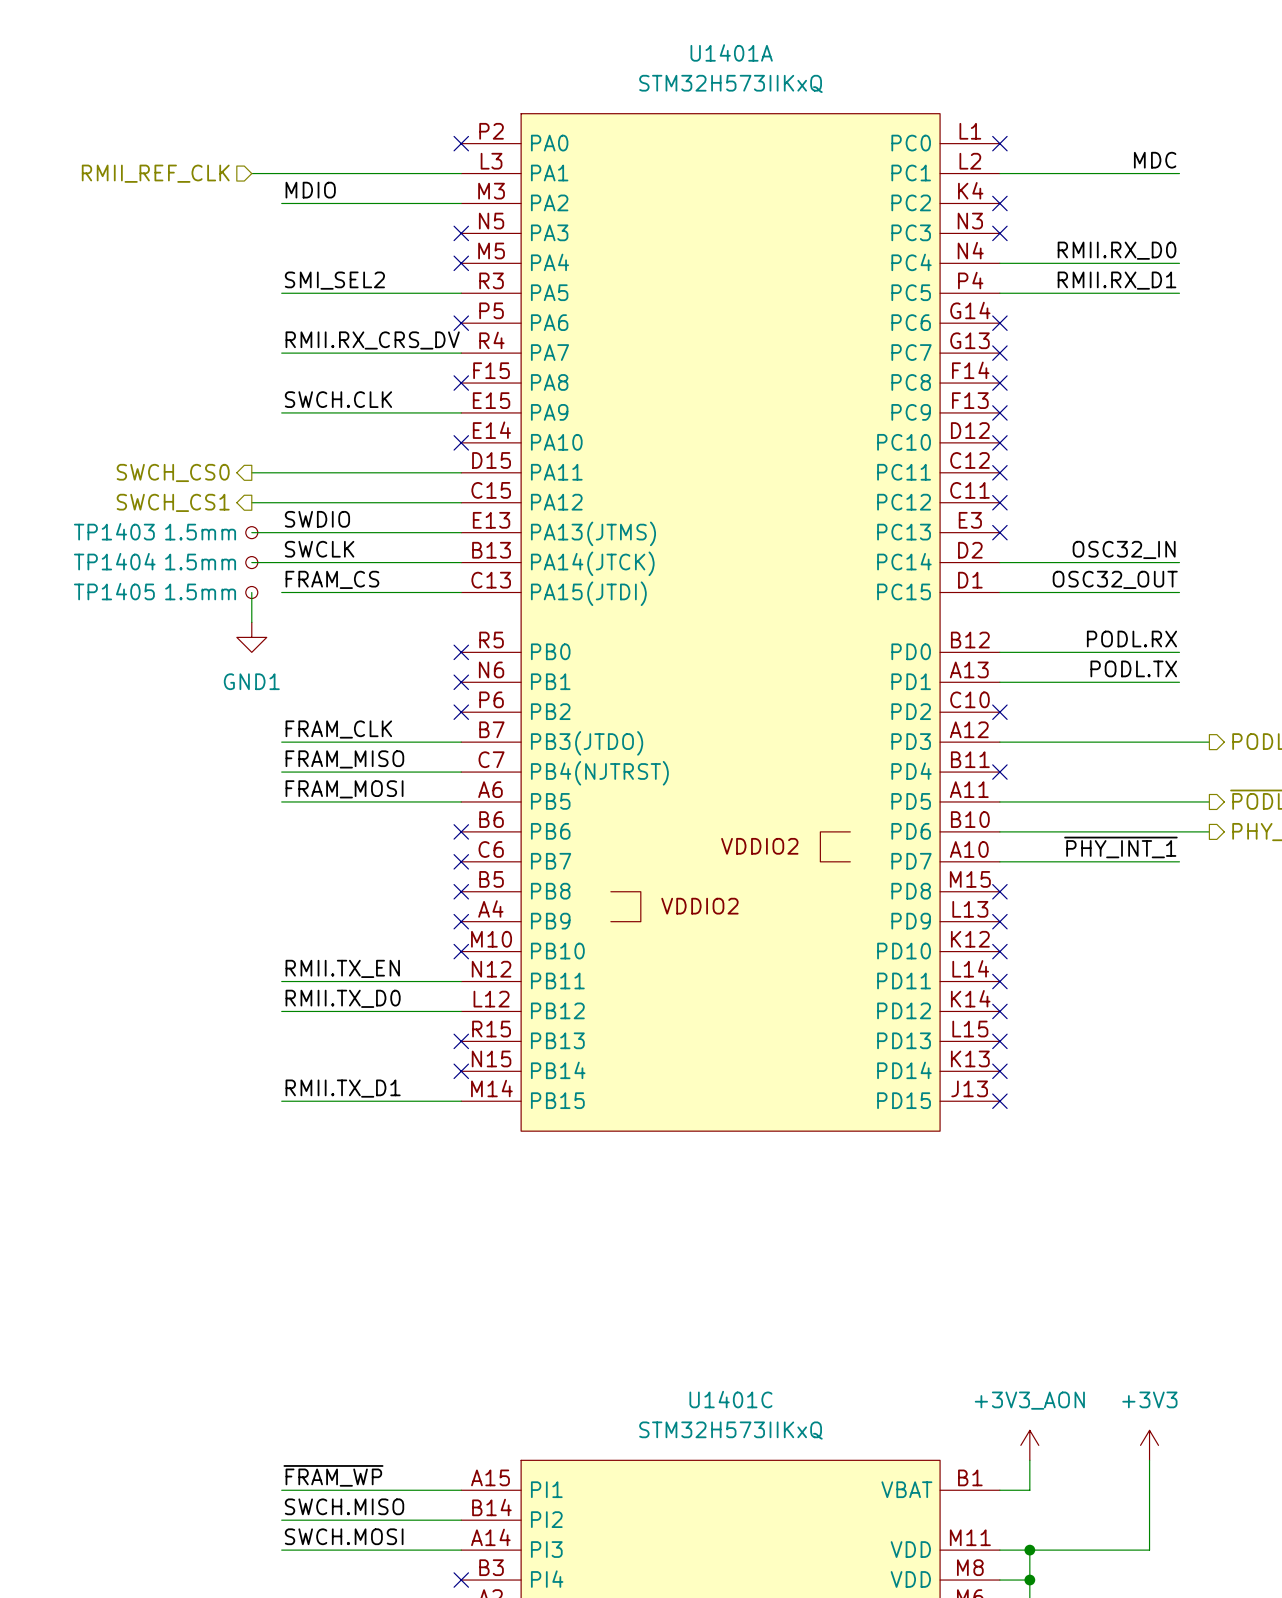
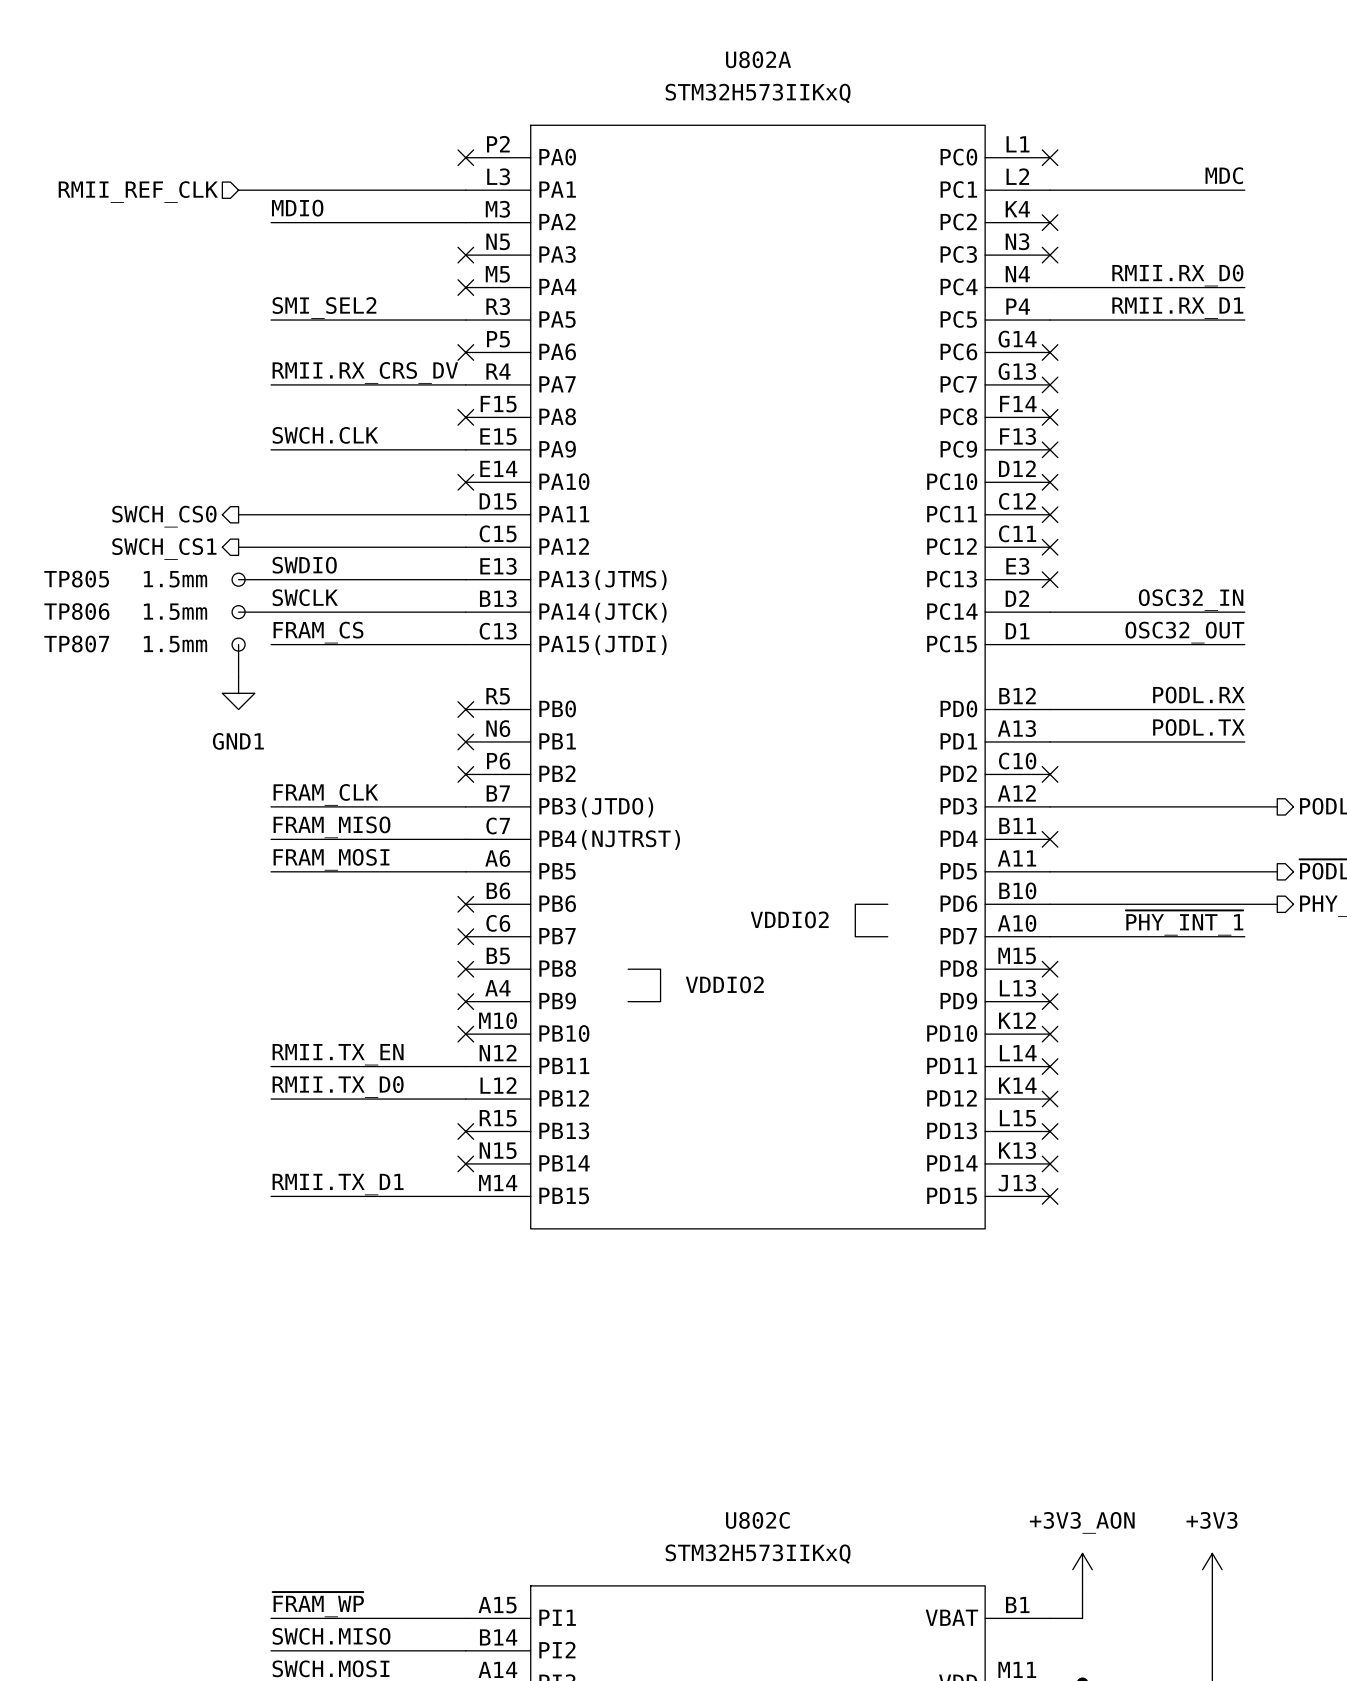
U1401A name: U1401A (731, 52) -> U802A (758, 59)
TP1403 name: TP1403 (114, 531) -> TP805 (76, 579)
TP1404 name: TP1404 (114, 561) -> TP806 (76, 611)
TP1405 name: TP1405 (114, 591) -> TP807 (76, 644)
U1401C name: U1401C (730, 1399) -> U802C (757, 1520)

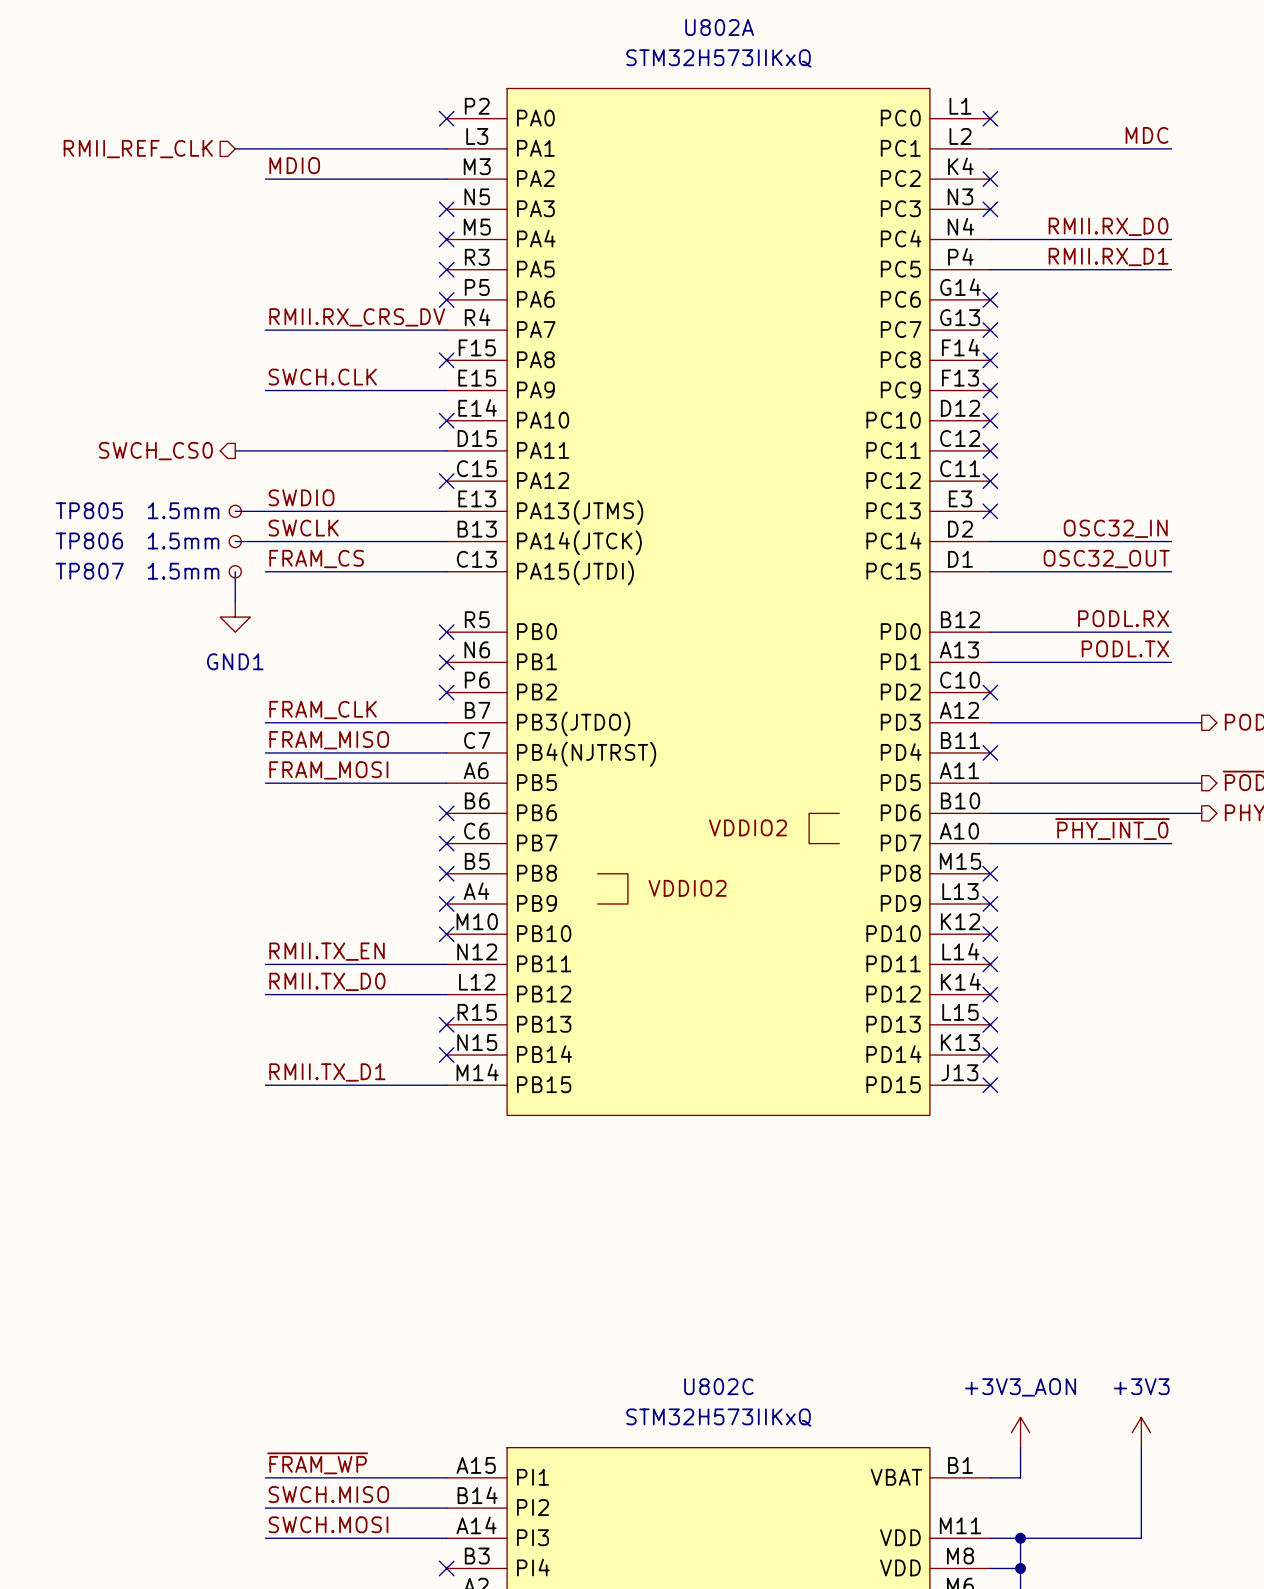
label: SMI_SEL2 (324, 308) -> none
wire: (271, 320) (465, 320) -> none
no-connect mark: none -> (446, 269)
wire: (238, 547) (465, 547) -> none
no-connect mark: none -> (446, 481)
hierarchical label: SWCH_CS1 (164, 549) -> none
label: ~{PHY_INT_1} (1184, 923) -> ~{PHY_INT_0} (1112, 829)

